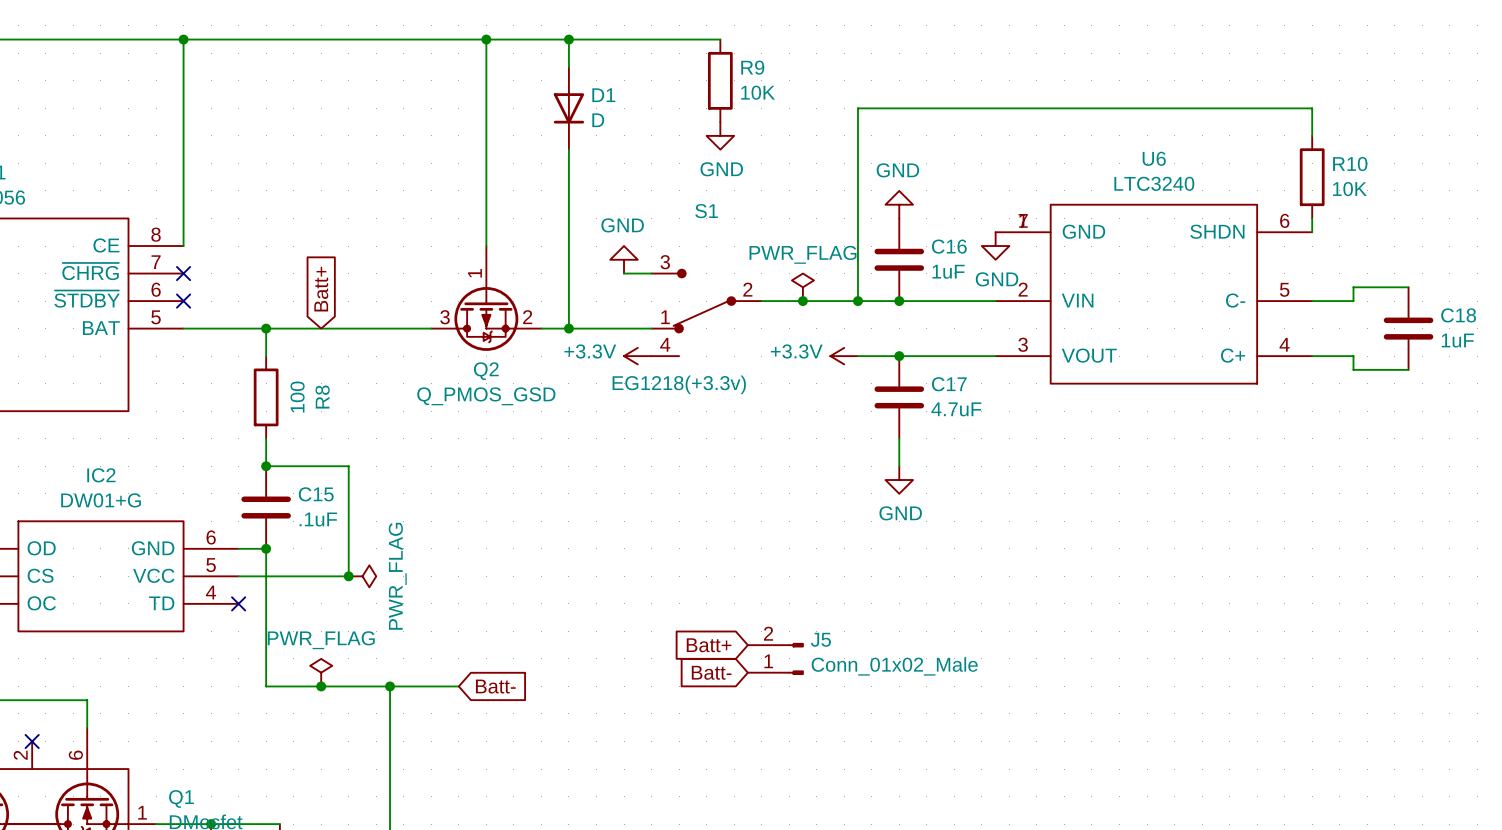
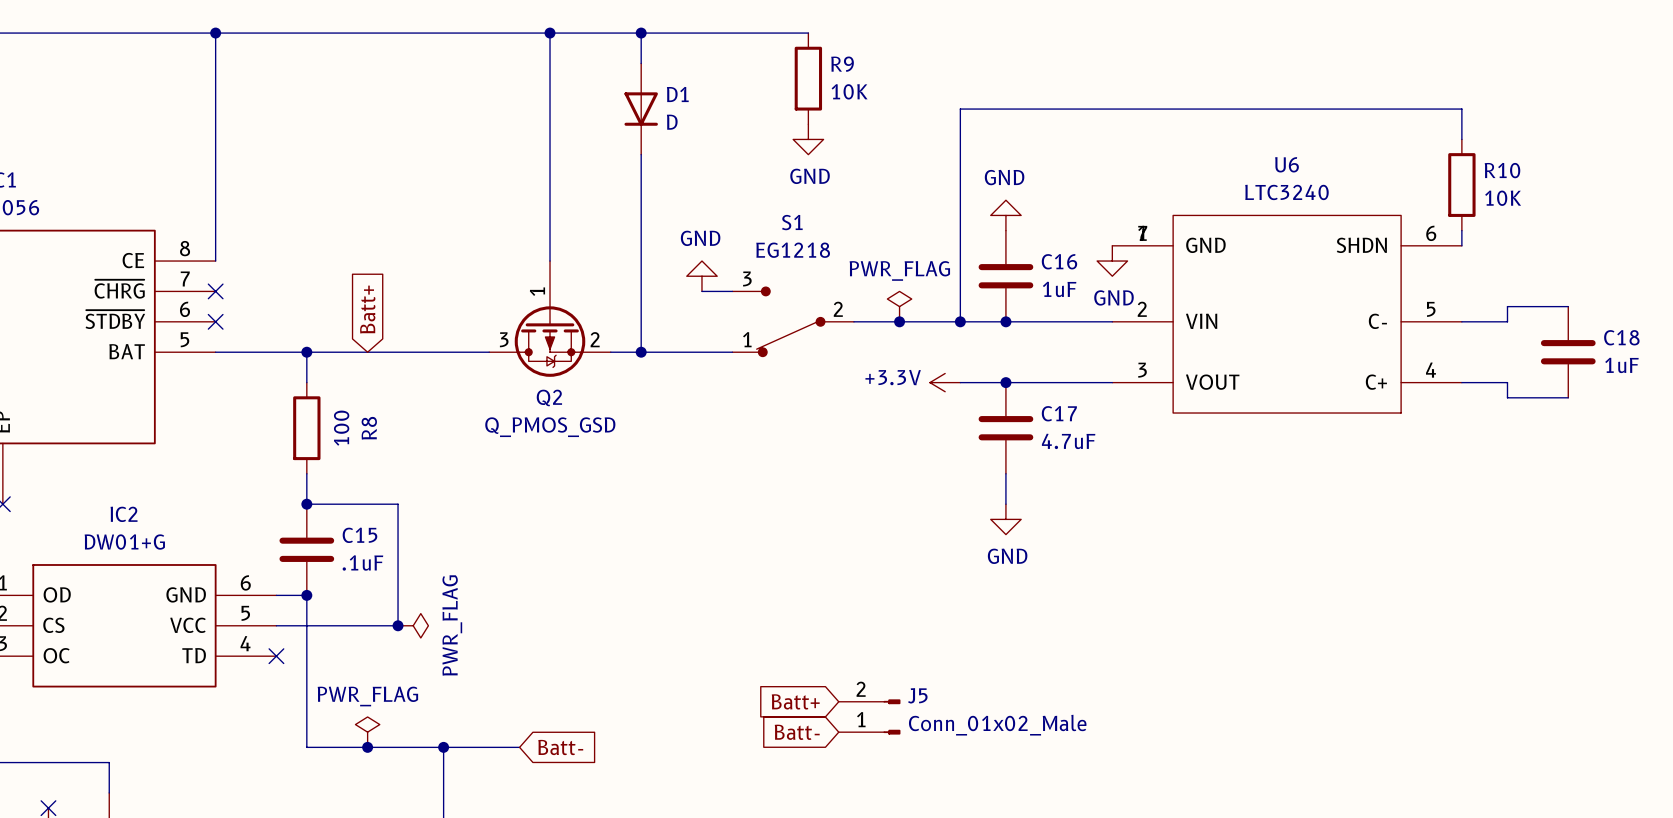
S1 symbol: [651, 269, 762, 357] -> [732, 287, 854, 357]
power symbol: +3.3V (637, 356) -> none
S1 value: EG1218(+3.3v) (679, 384) -> EG1218 (793, 250)

